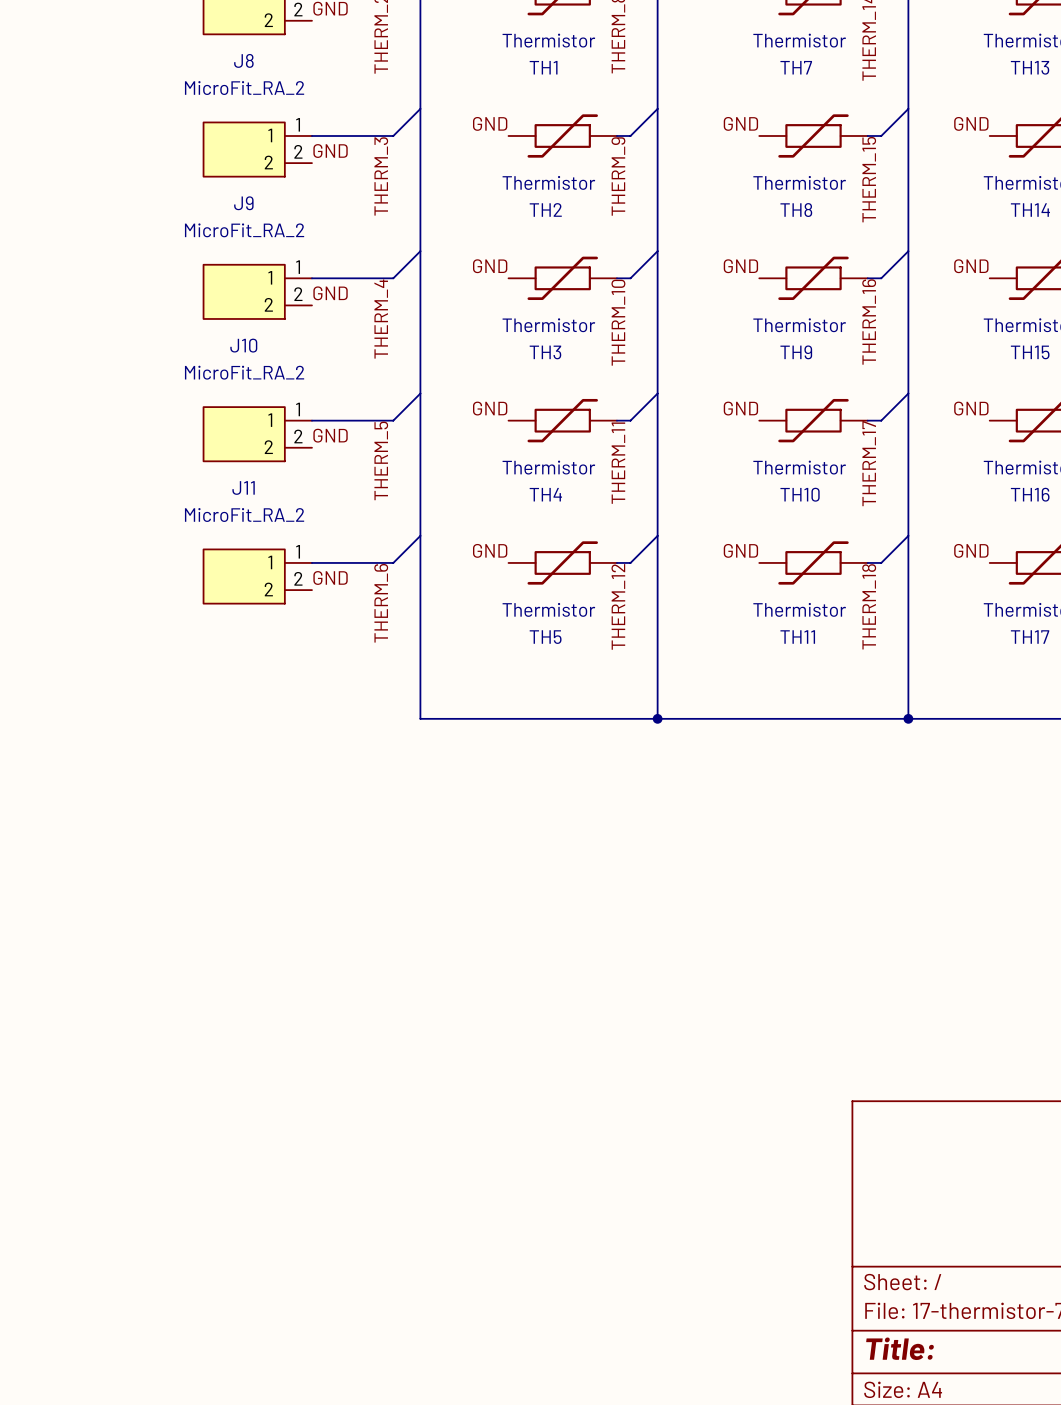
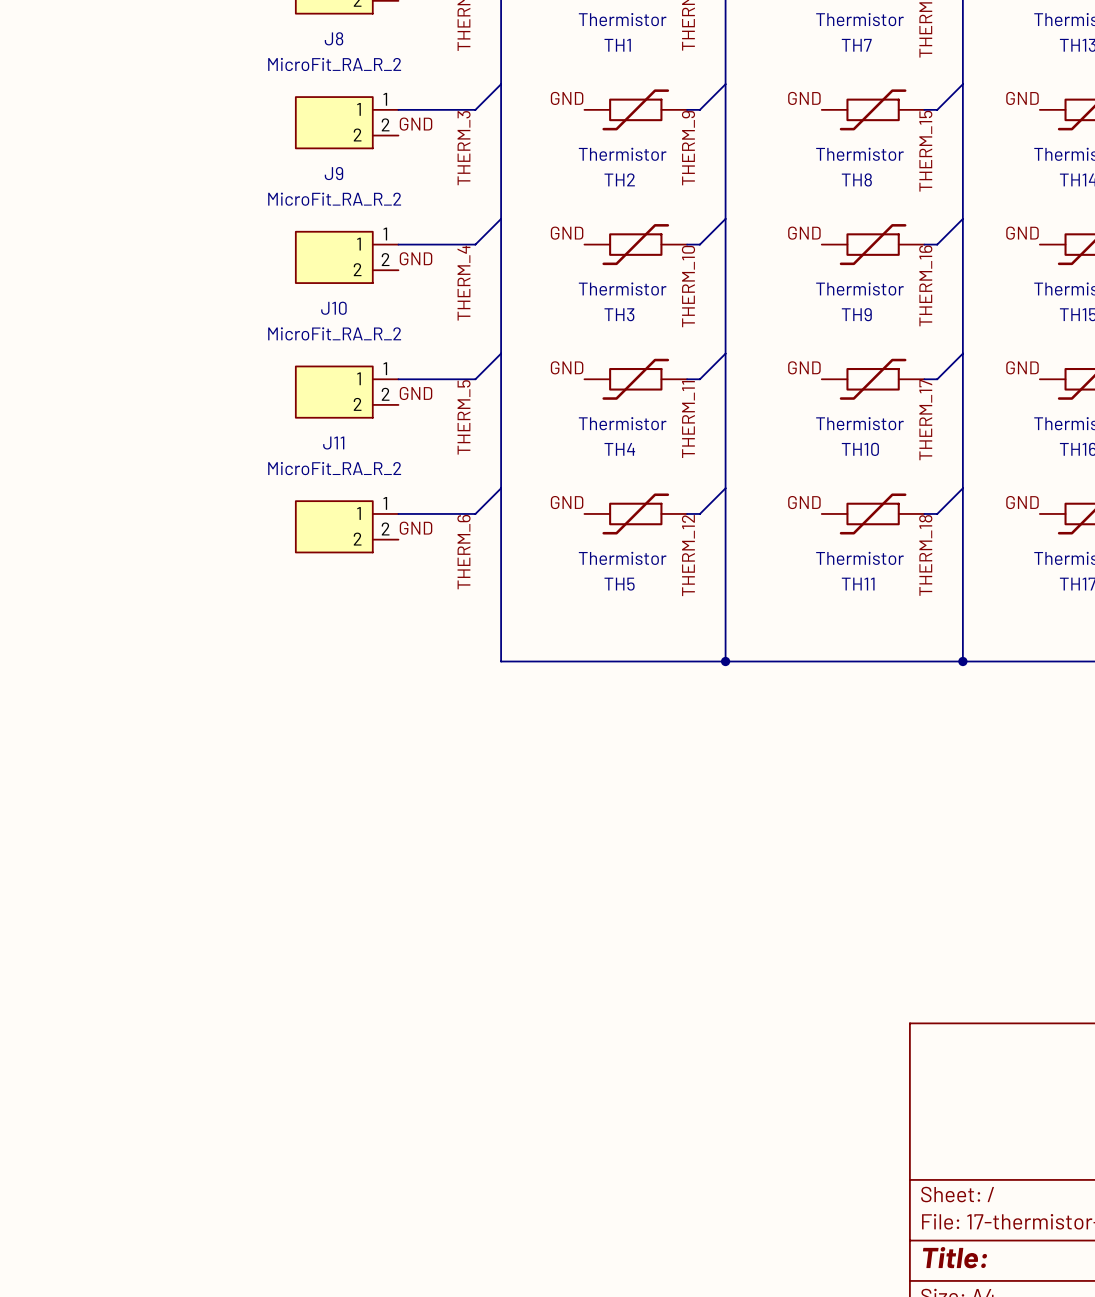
J8 value: MicroFit_RA_2 (244, 88) -> MicroFit_RA_R_2 (334, 64)
J9 value: MicroFit_RA_2 (244, 230) -> MicroFit_RA_R_2 (334, 199)
J10 value: MicroFit_RA_2 (244, 372) -> MicroFit_RA_R_2 (334, 333)
J11 value: MicroFit_RA_2 (244, 515) -> MicroFit_RA_R_2 (334, 468)

